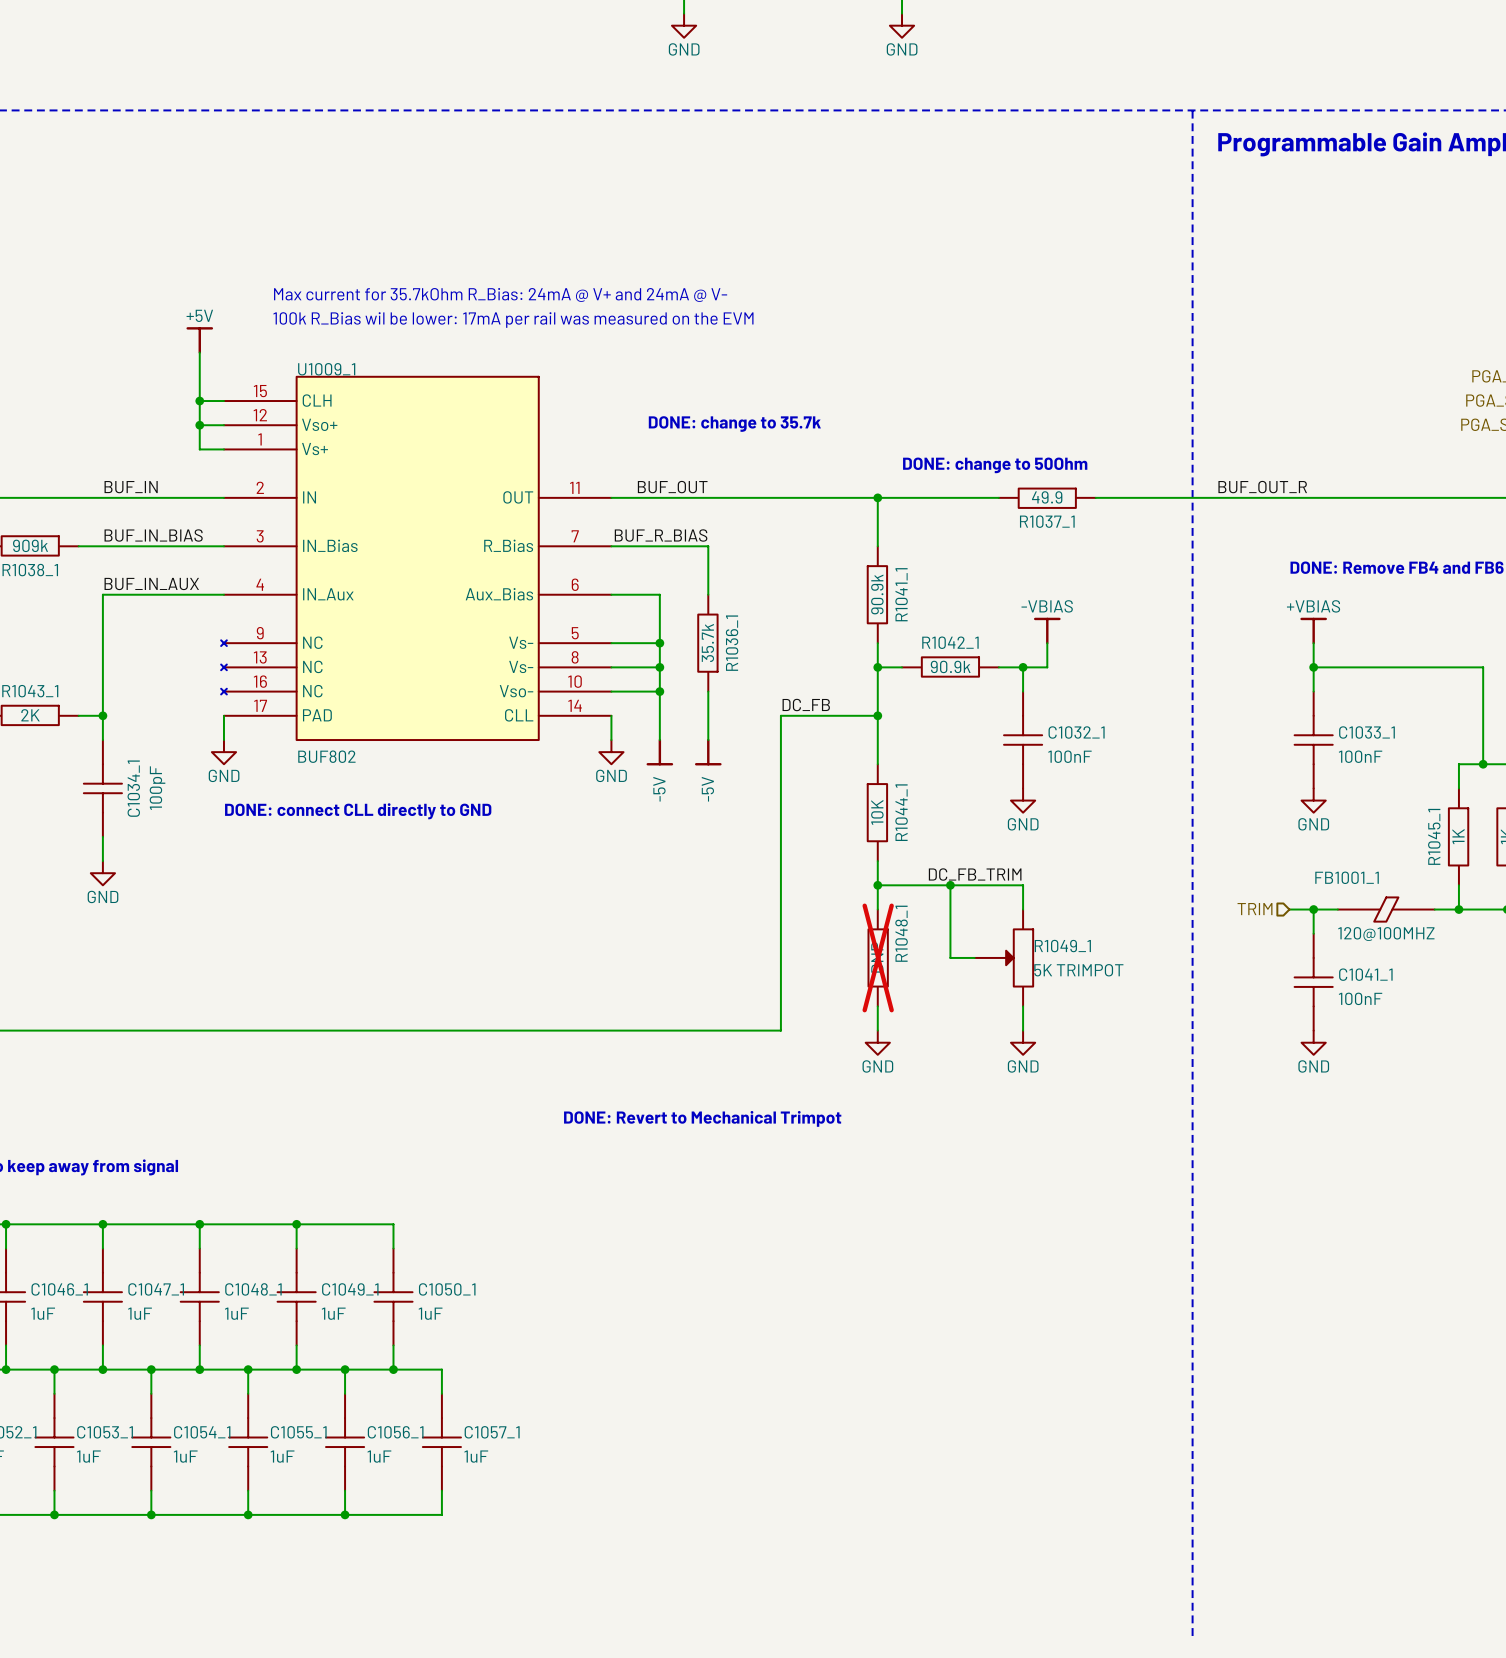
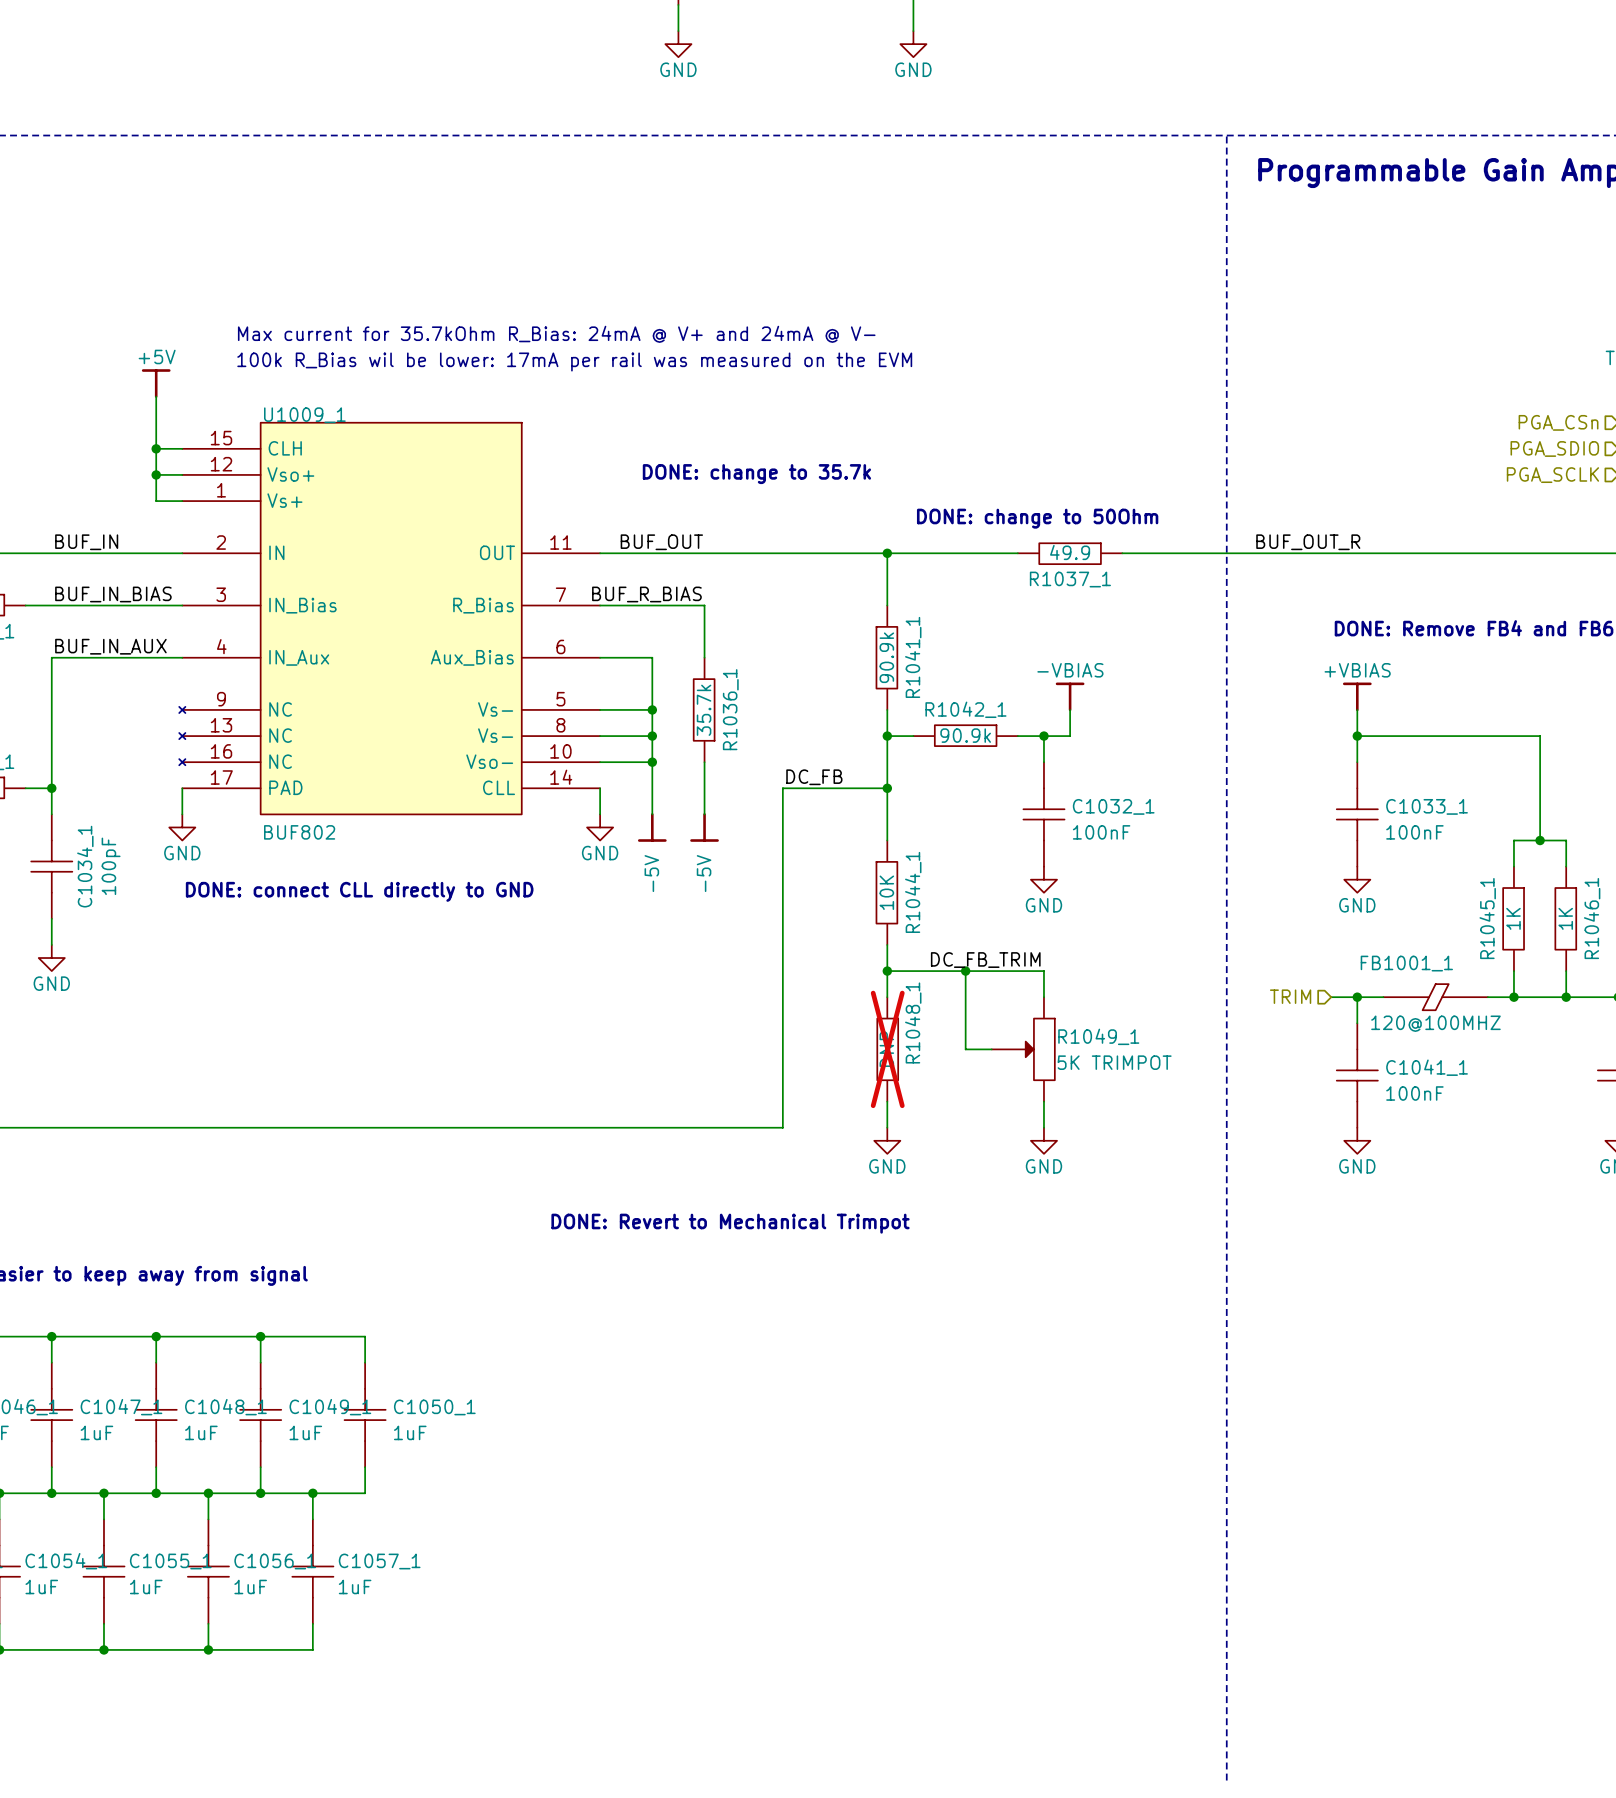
wire: (393, 1369) (441, 1369) (441, 1393) -> none
junction: (393, 1369) -> none
C1053_1 name: C1053_1 (105, 1432) -> C1054_1 (66, 1561)
C1054_1 name: C1054_1 (202, 1432) -> C1055_1 (170, 1561)
C1055_1 name: C1055_1 (298, 1432) -> C1056_1 (275, 1561)
C1056_1 name: C1056_1 (395, 1432) -> C1057_1 (379, 1561)
C1057_1: 1uF (441, 1442) -> none
wire: (441, 1490) (441, 1514) (345, 1514) -> none
junction: (345, 1514) -> none

